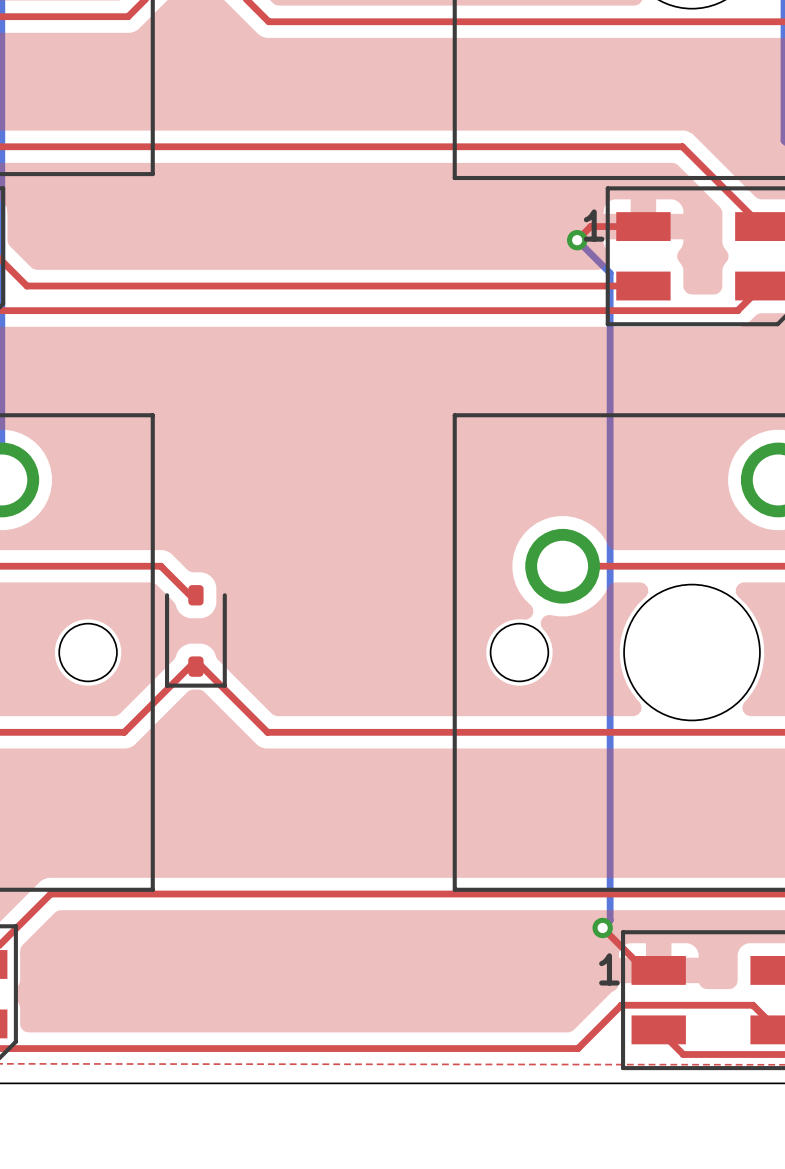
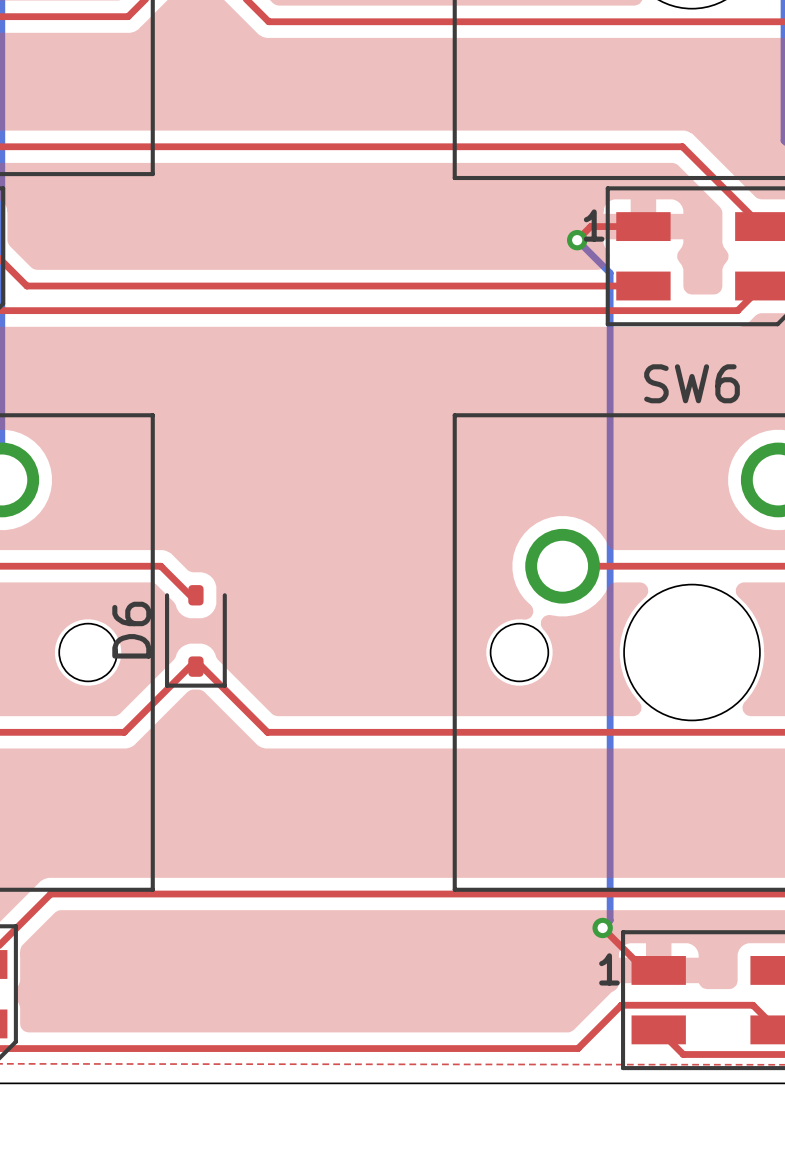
SW6 name: none -> SW6 (692, 383)
D6 name: none -> D6 (131, 630)

